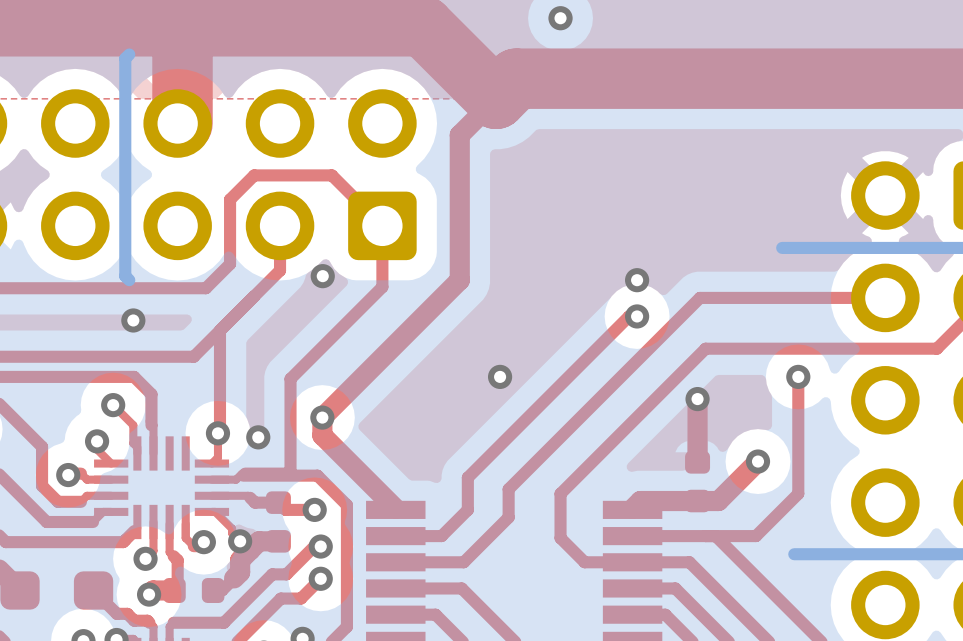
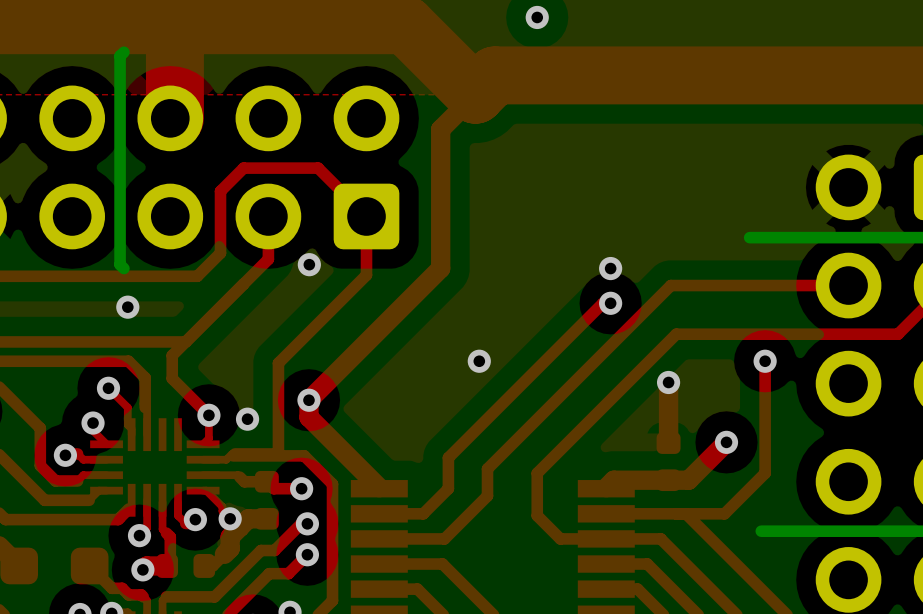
top track: (219, 330) (219, 431) (217, 433) -> (185, 341) (172, 355) (172, 378) (208, 415)

